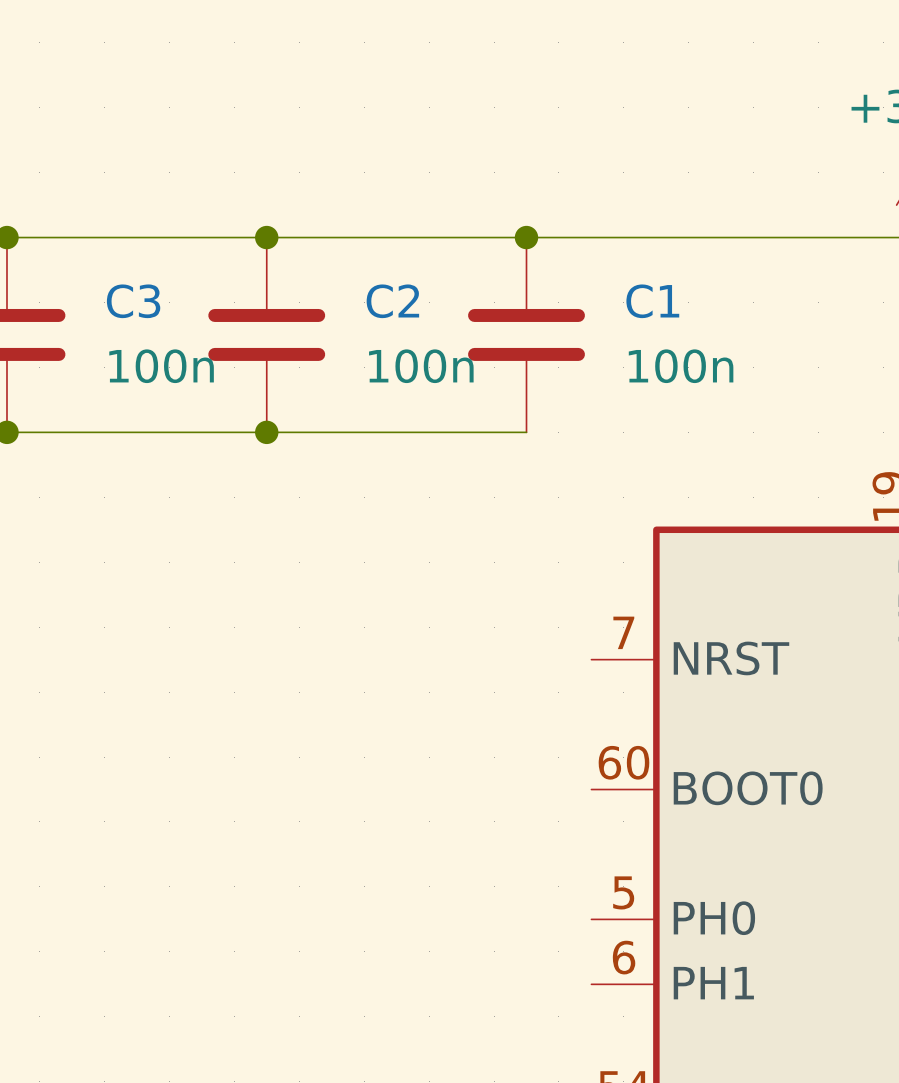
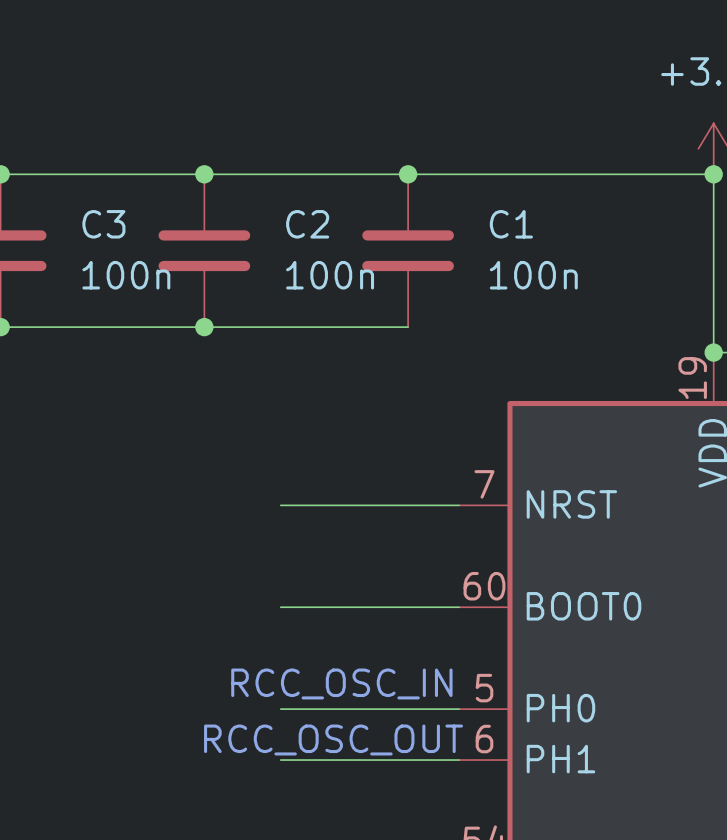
wire: none -> (280, 505) (459, 505)
wire: none -> (280, 607) (459, 607)
text: none -> RCC_OSC_IN (341, 683)
wire: none -> (280, 709) (459, 709)
text: none -> RCC_OSC_OUT (333, 740)
wire: none -> (280, 760) (459, 760)

